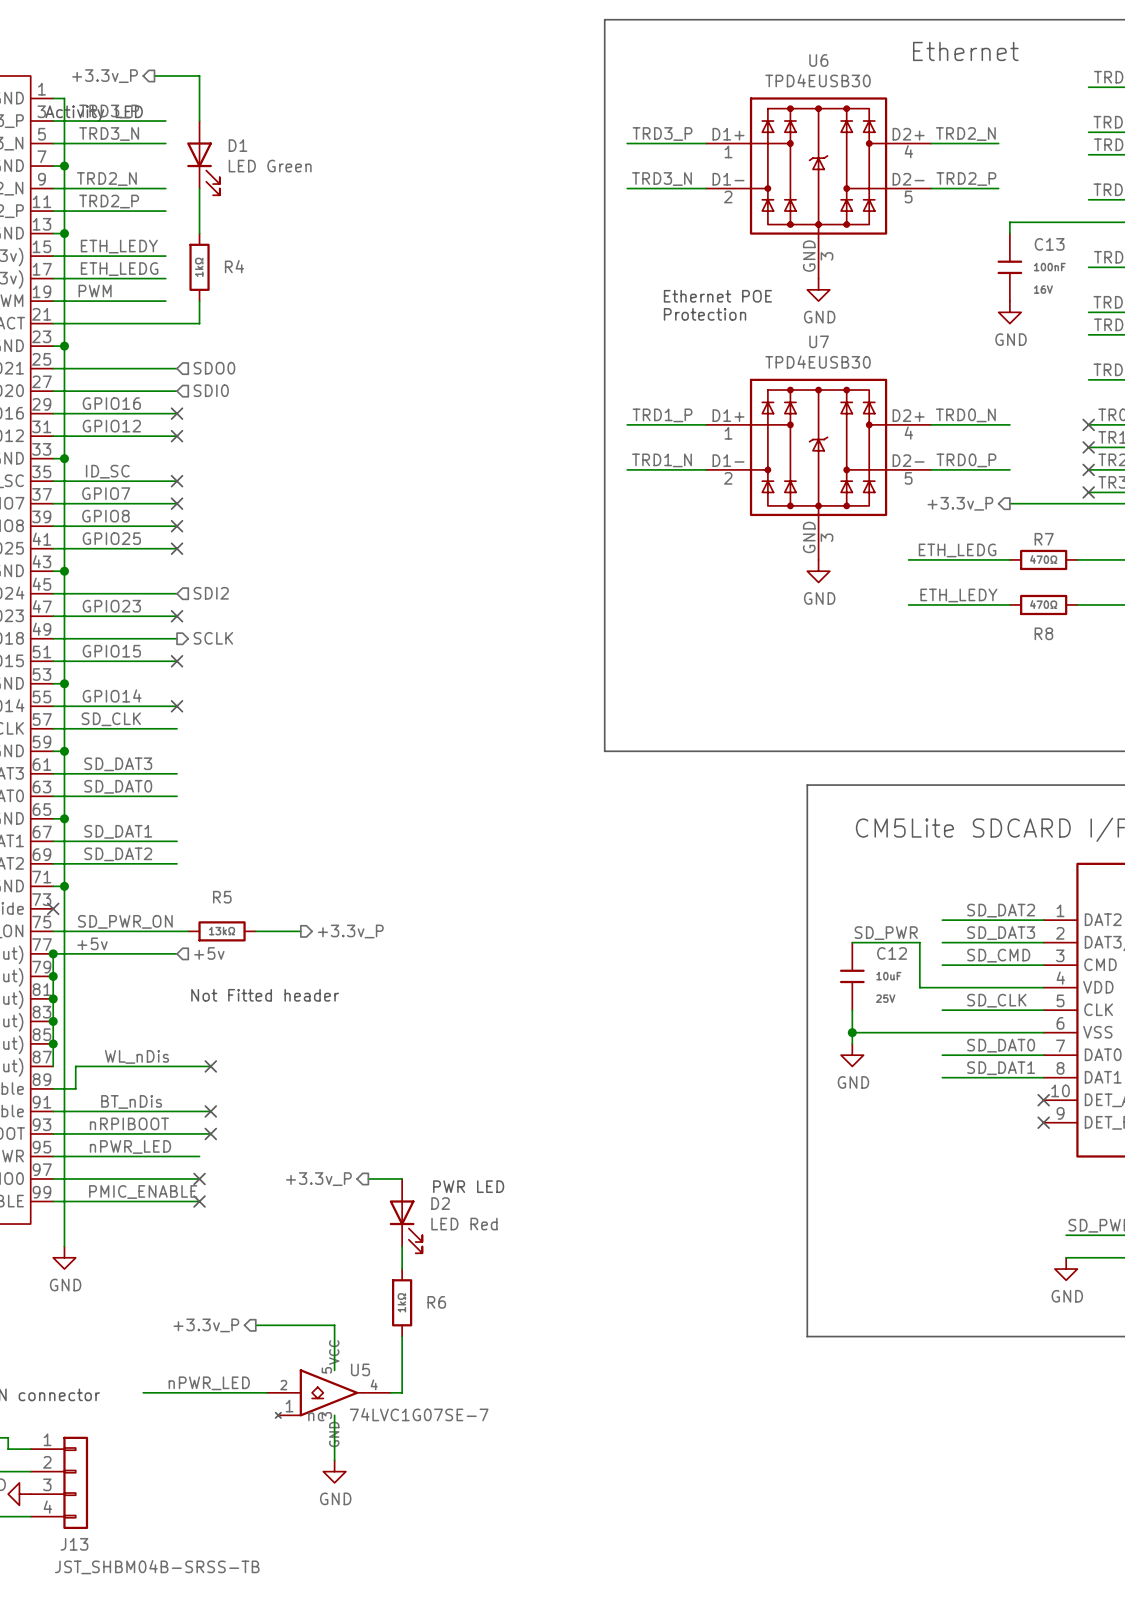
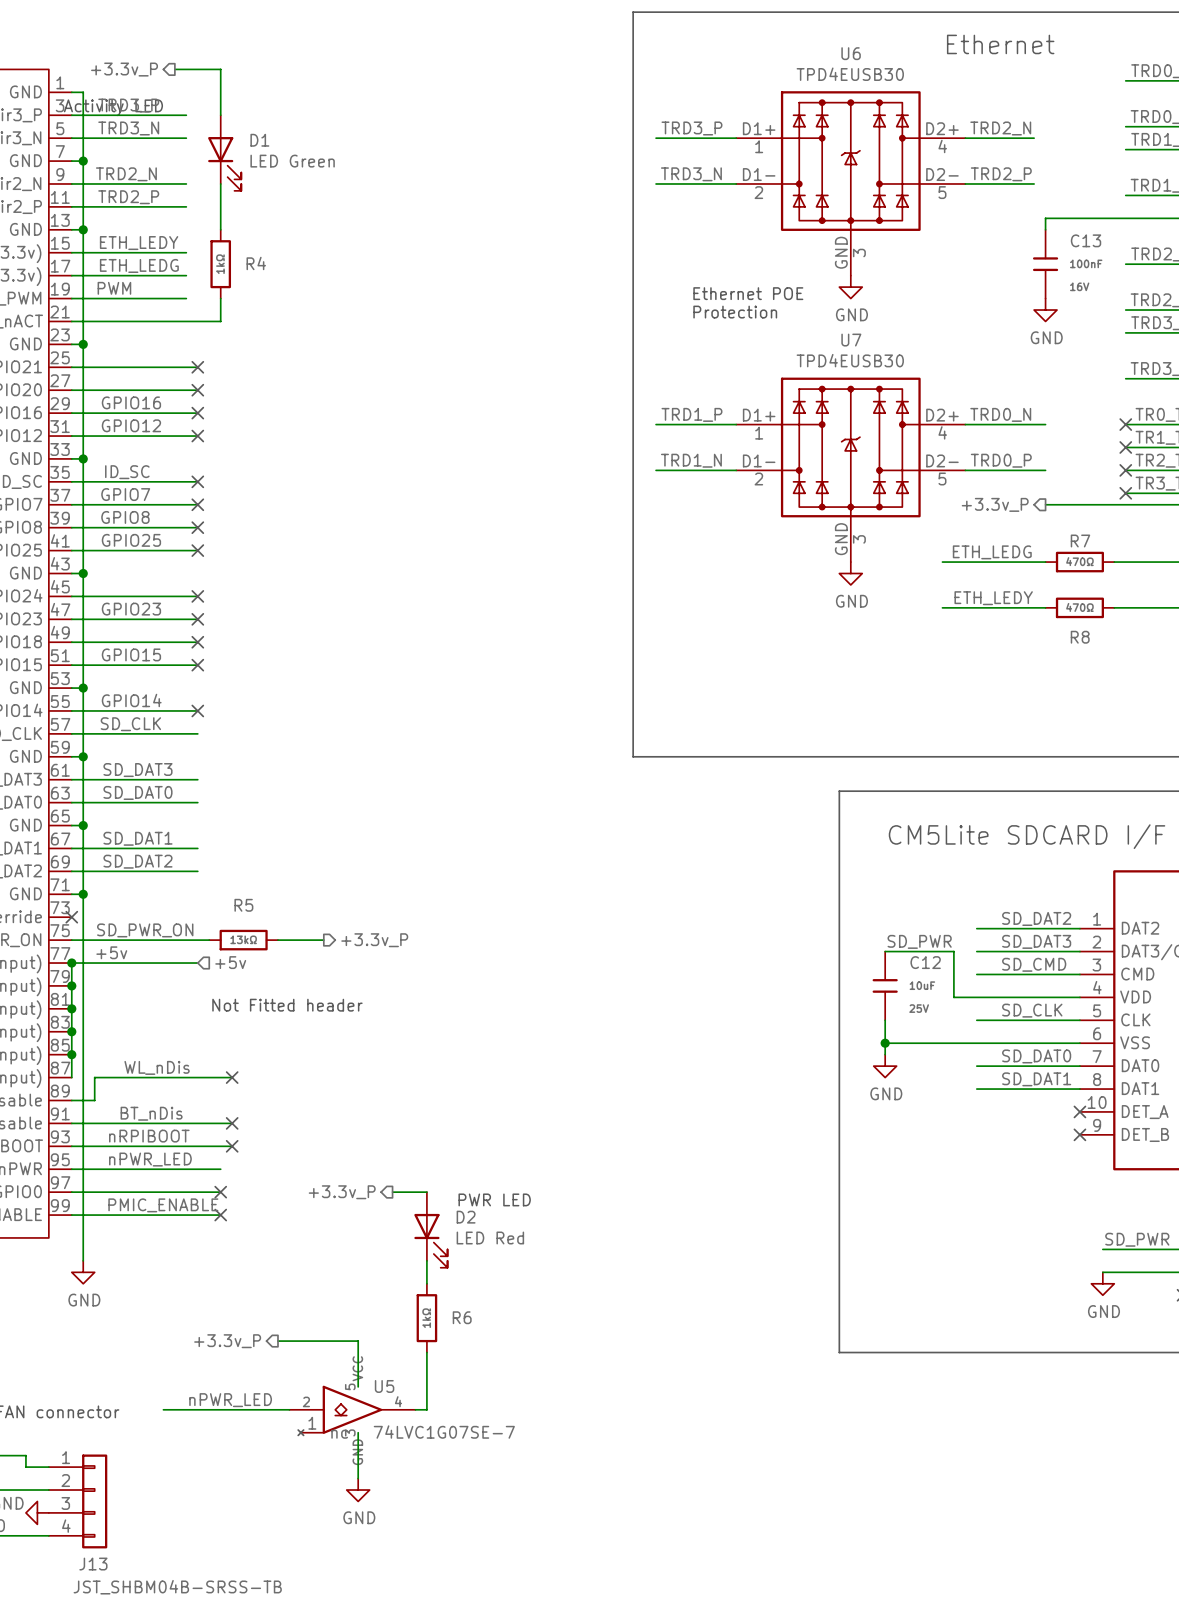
no-connect mark: none -> (197, 367)
hierarchical label: SDO0 (214, 368) -> none
hierarchical label: SDI0 (211, 390) -> none
no-connect mark: none -> (197, 390)
no-connect mark: none -> (197, 596)
hierarchical label: SDI2 (211, 593) -> none
no-connect mark: none -> (197, 642)
hierarchical label: SCLK (213, 638) -> none

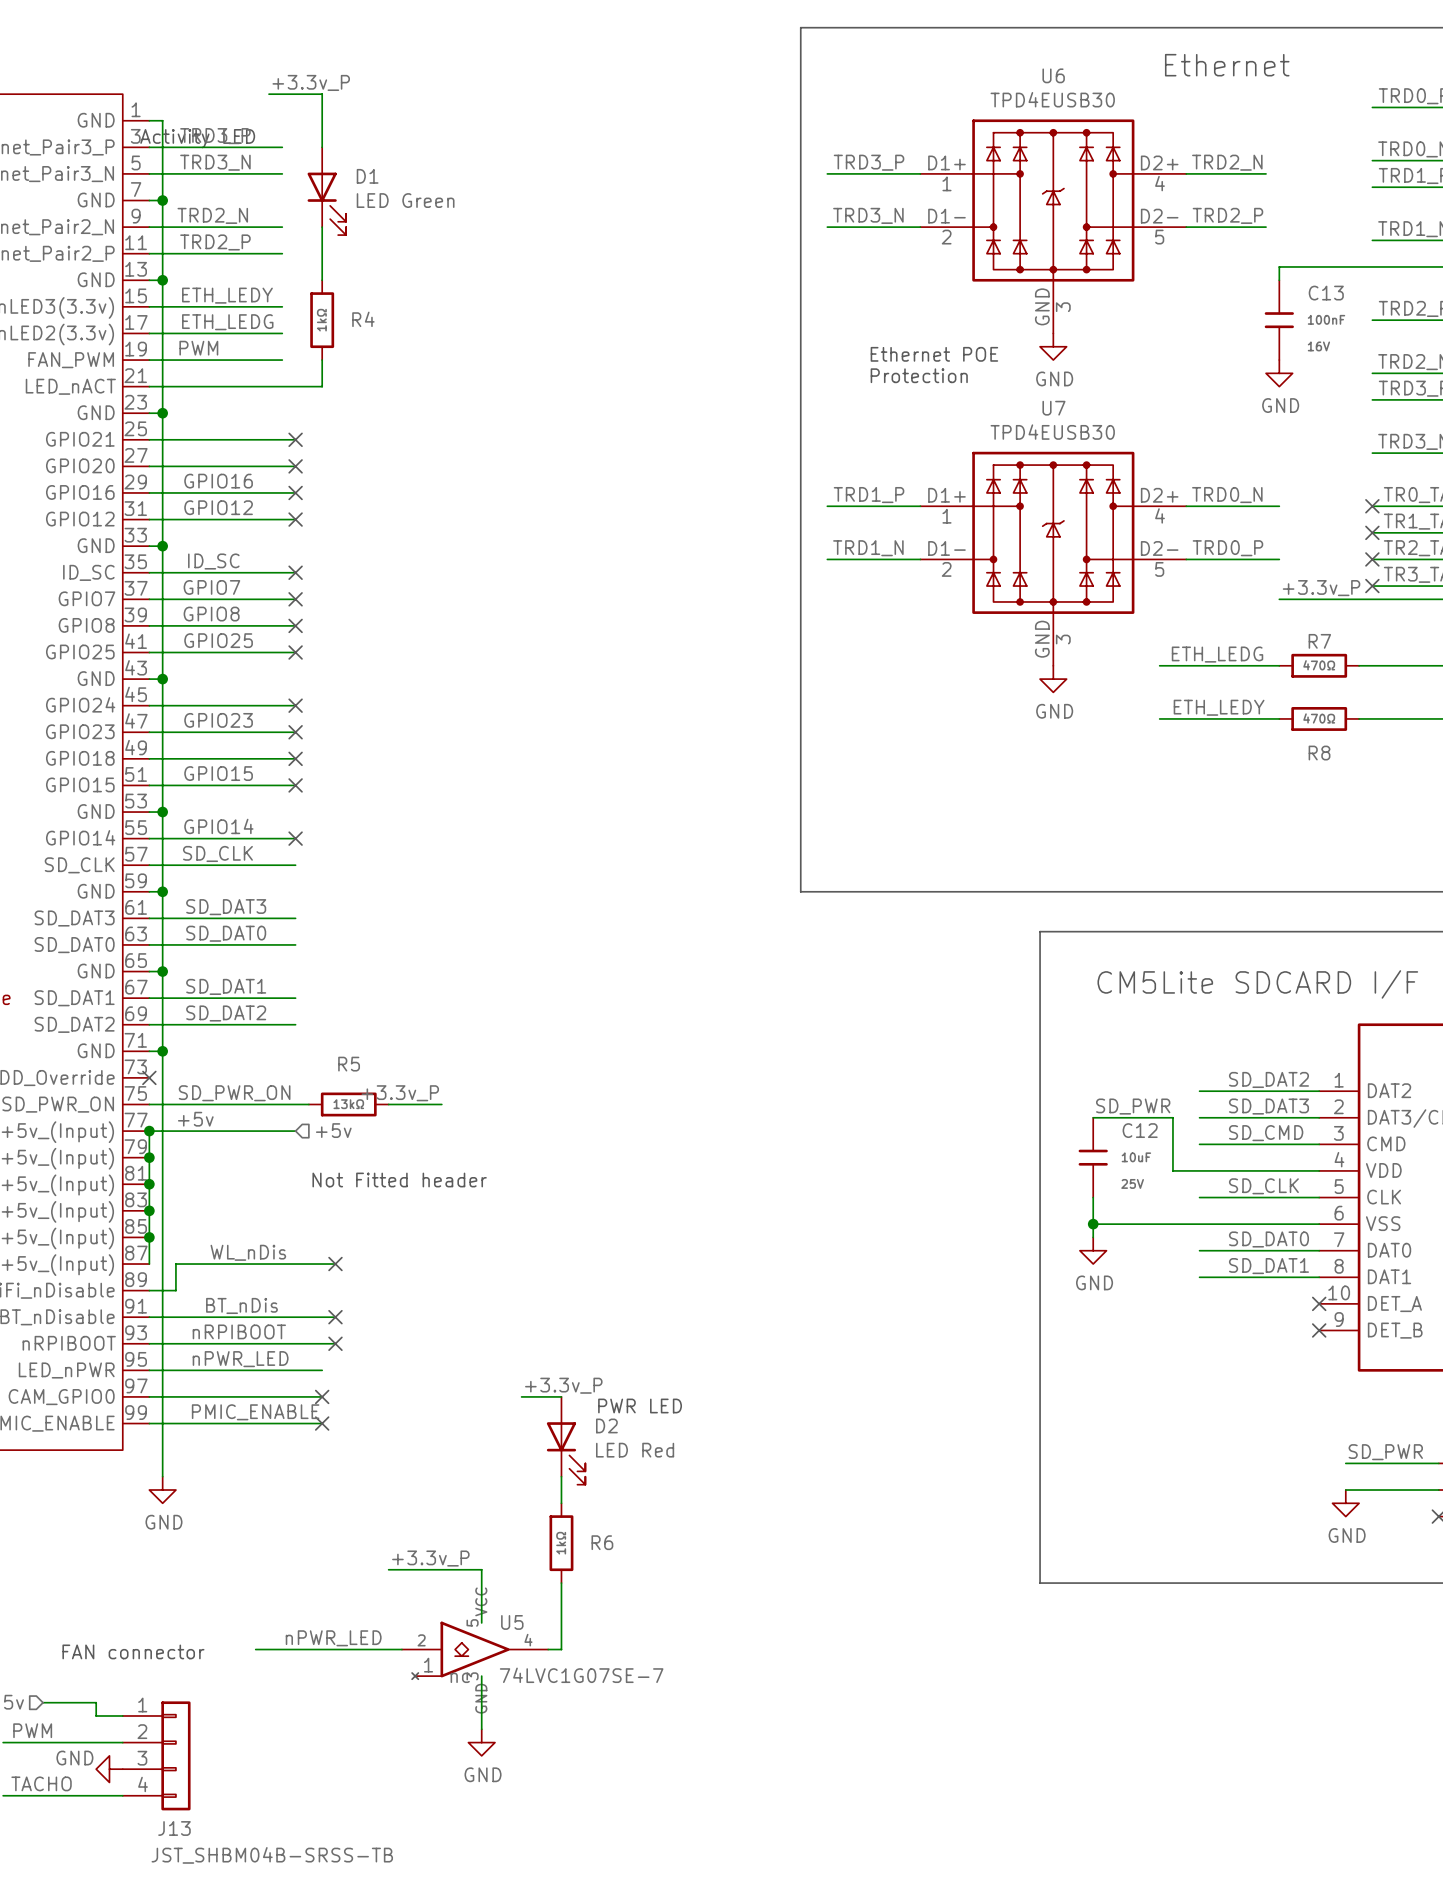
label: none -> +3.3v_P (311, 82)
hierarchical label: +3.3v_P (124, 69) -> none
label: none -> +3.3v_P (1321, 588)
hierarchical label: +3.3v_P (995, 504) -> none
label: none -> +3.3v_P (400, 1093)
hierarchical label: +3.3v_P (374, 940) -> none
label: none -> +3.3v_P (563, 1385)
hierarchical label: +3.3v_P (342, 1192) -> none
label: none -> +3.3v_P (430, 1558)
hierarchical label: +3.3v_P (227, 1341) -> none

